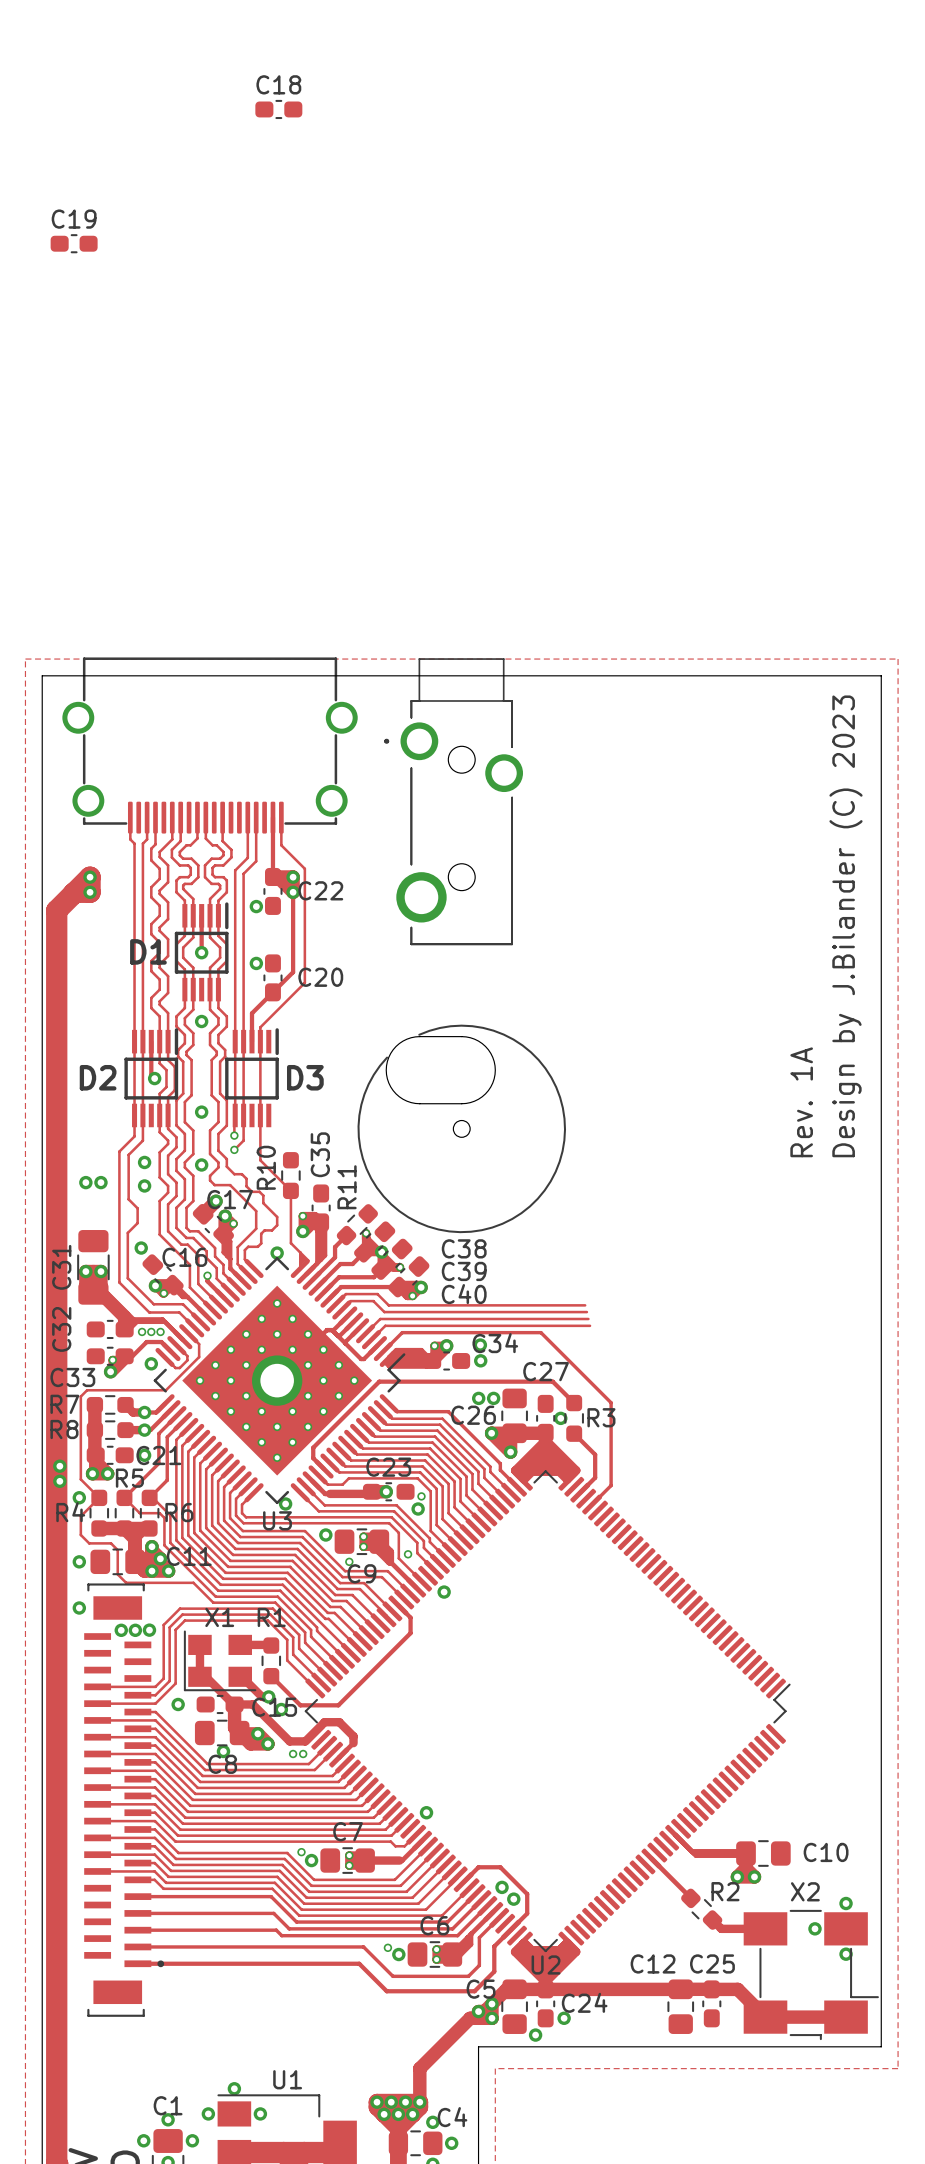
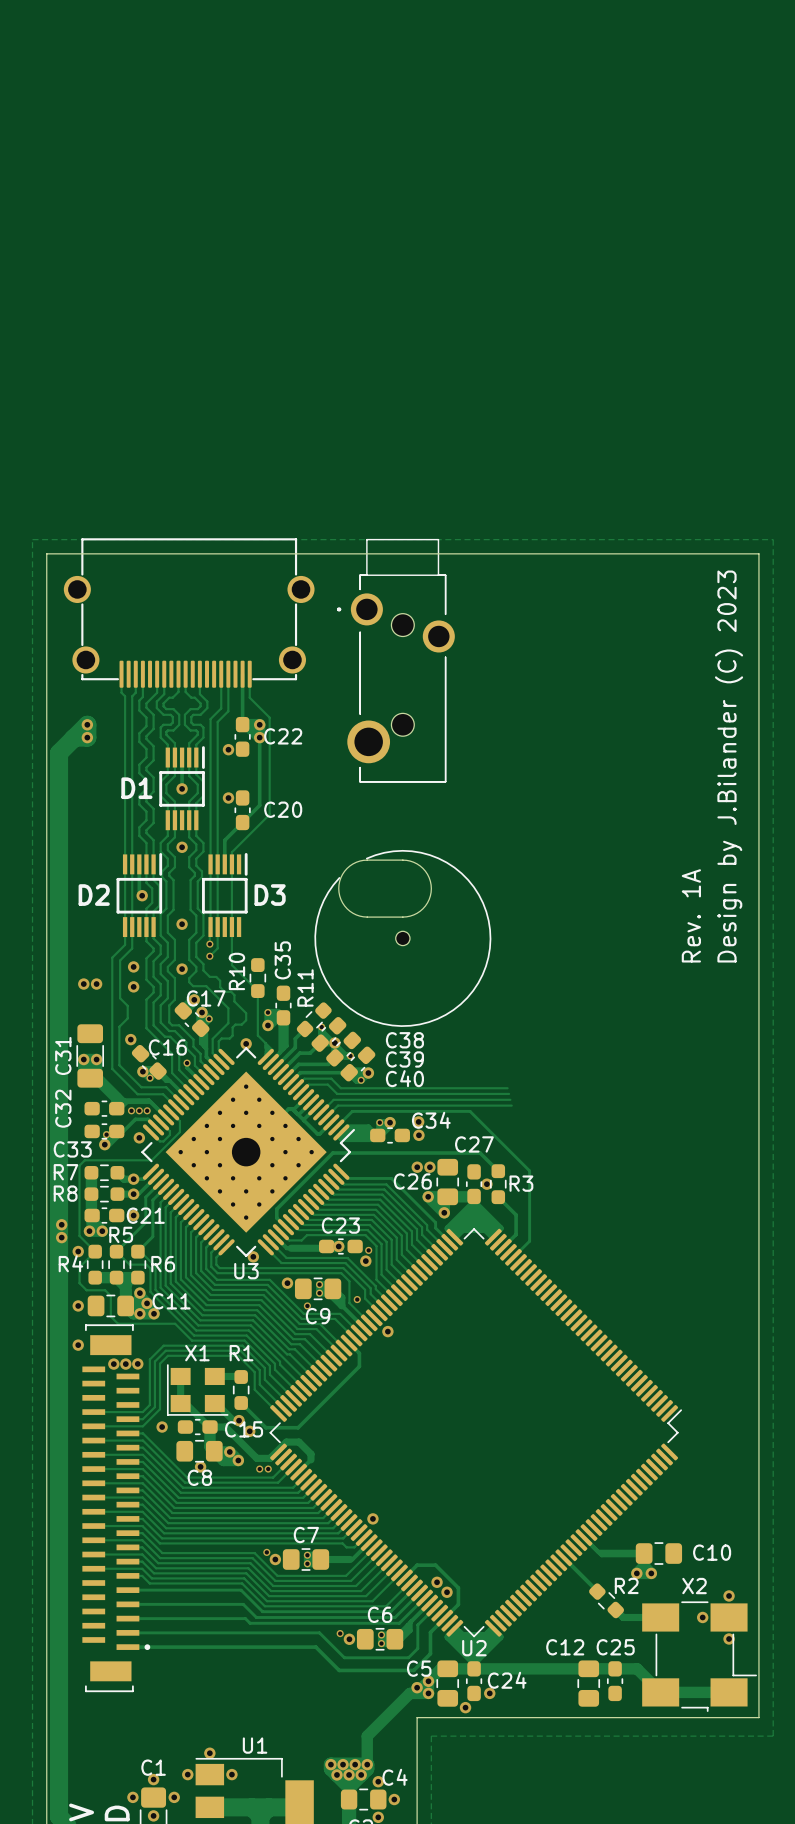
C18: (278, 109) -> none
C19: (74, 243) -> none

